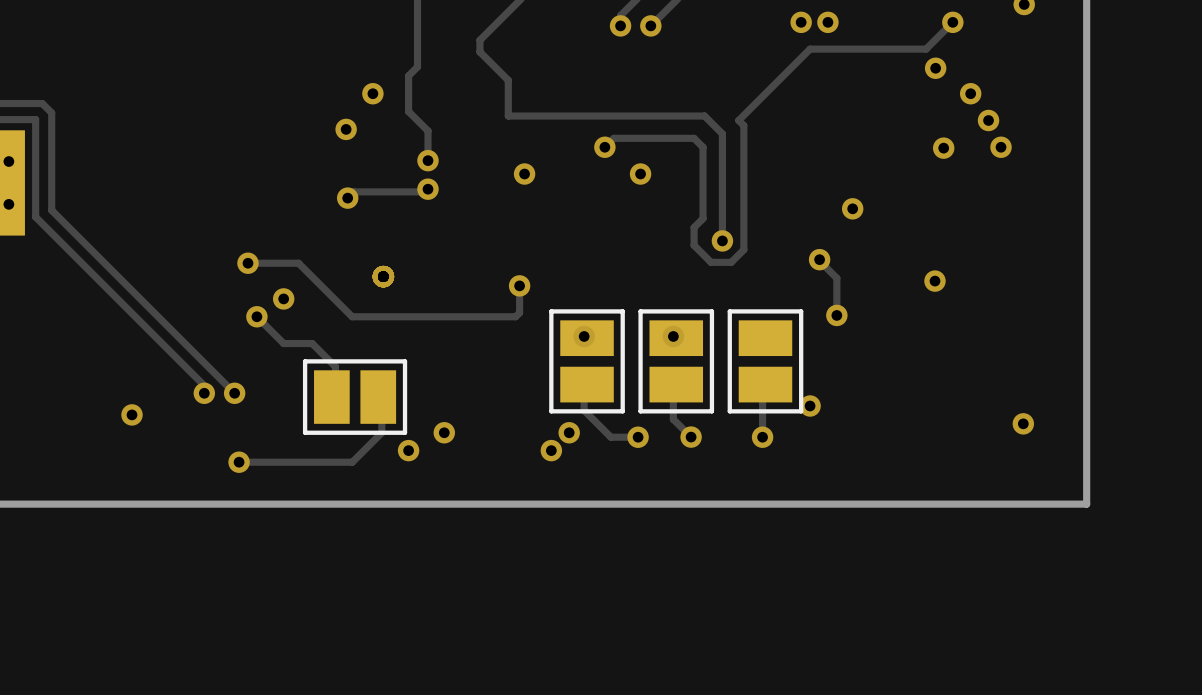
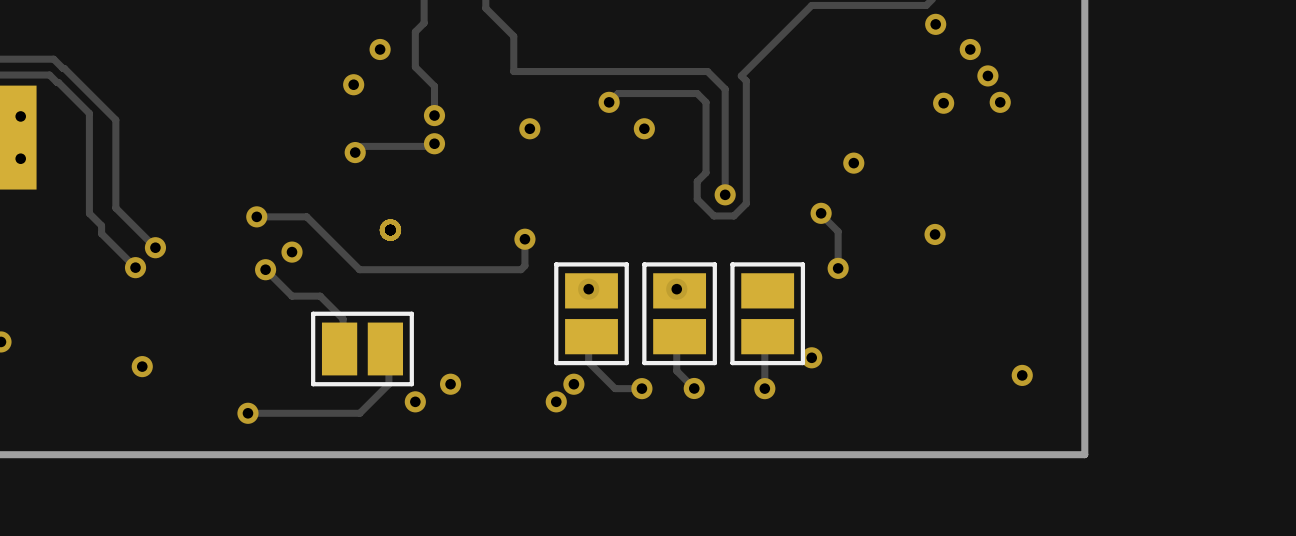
track: (51, 112) (51, 210) (234, 393) -> (62, 68) (115, 119) (115, 208) (155, 247)
track: (35, 119) (35, 216) (78, 259) -> (47, 75) (58, 82) (89, 113) (89, 213)
track: (90, 272) (204, 385) (204, 393) -> (101, 225) (101, 233) (135, 267)
via: none -> (155, 247)
via: none -> (135, 267)
via: (204, 393) -> none
via: (234, 393) -> none

